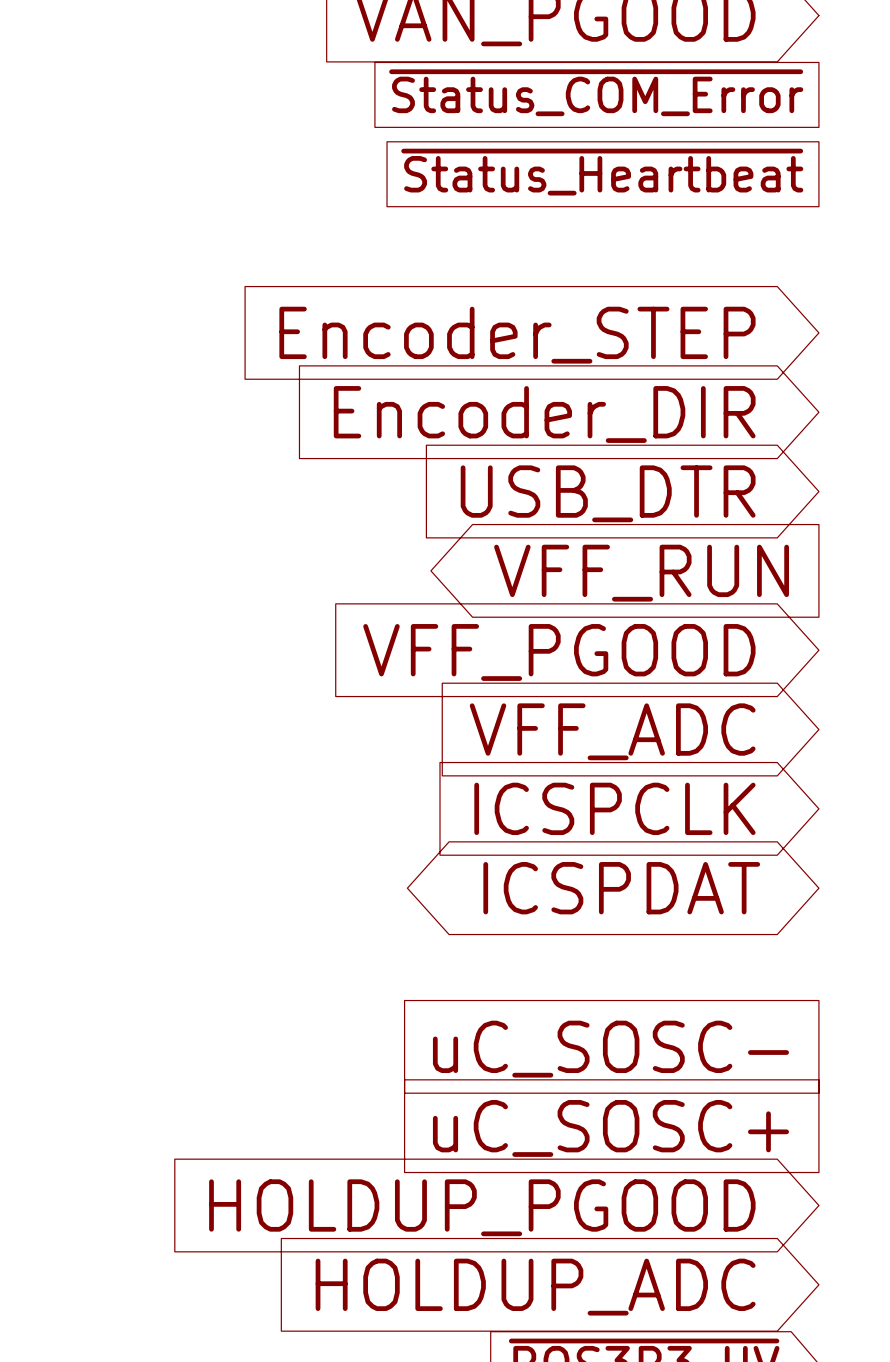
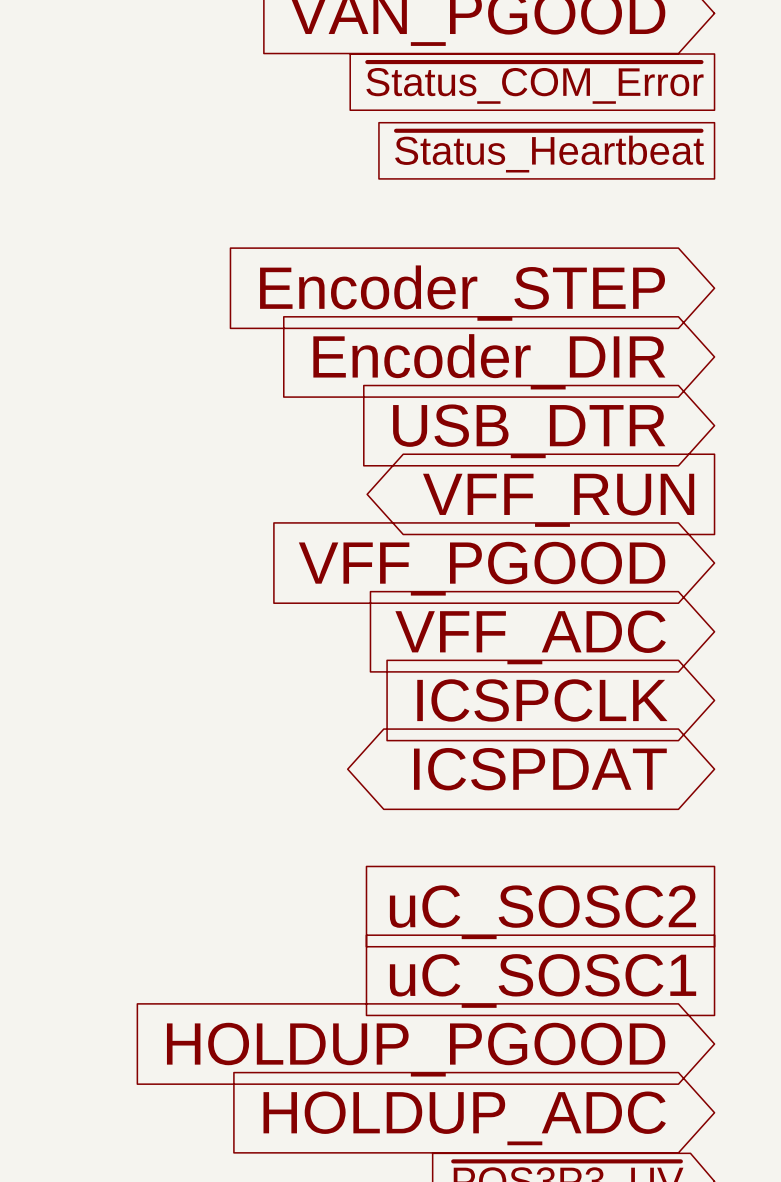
global label: uC_SOSC- (610, 1049) -> uC_SOSC2 (542, 912)
global label: uC_SOSC+ (610, 1128) -> uC_SOSC1 (543, 980)

